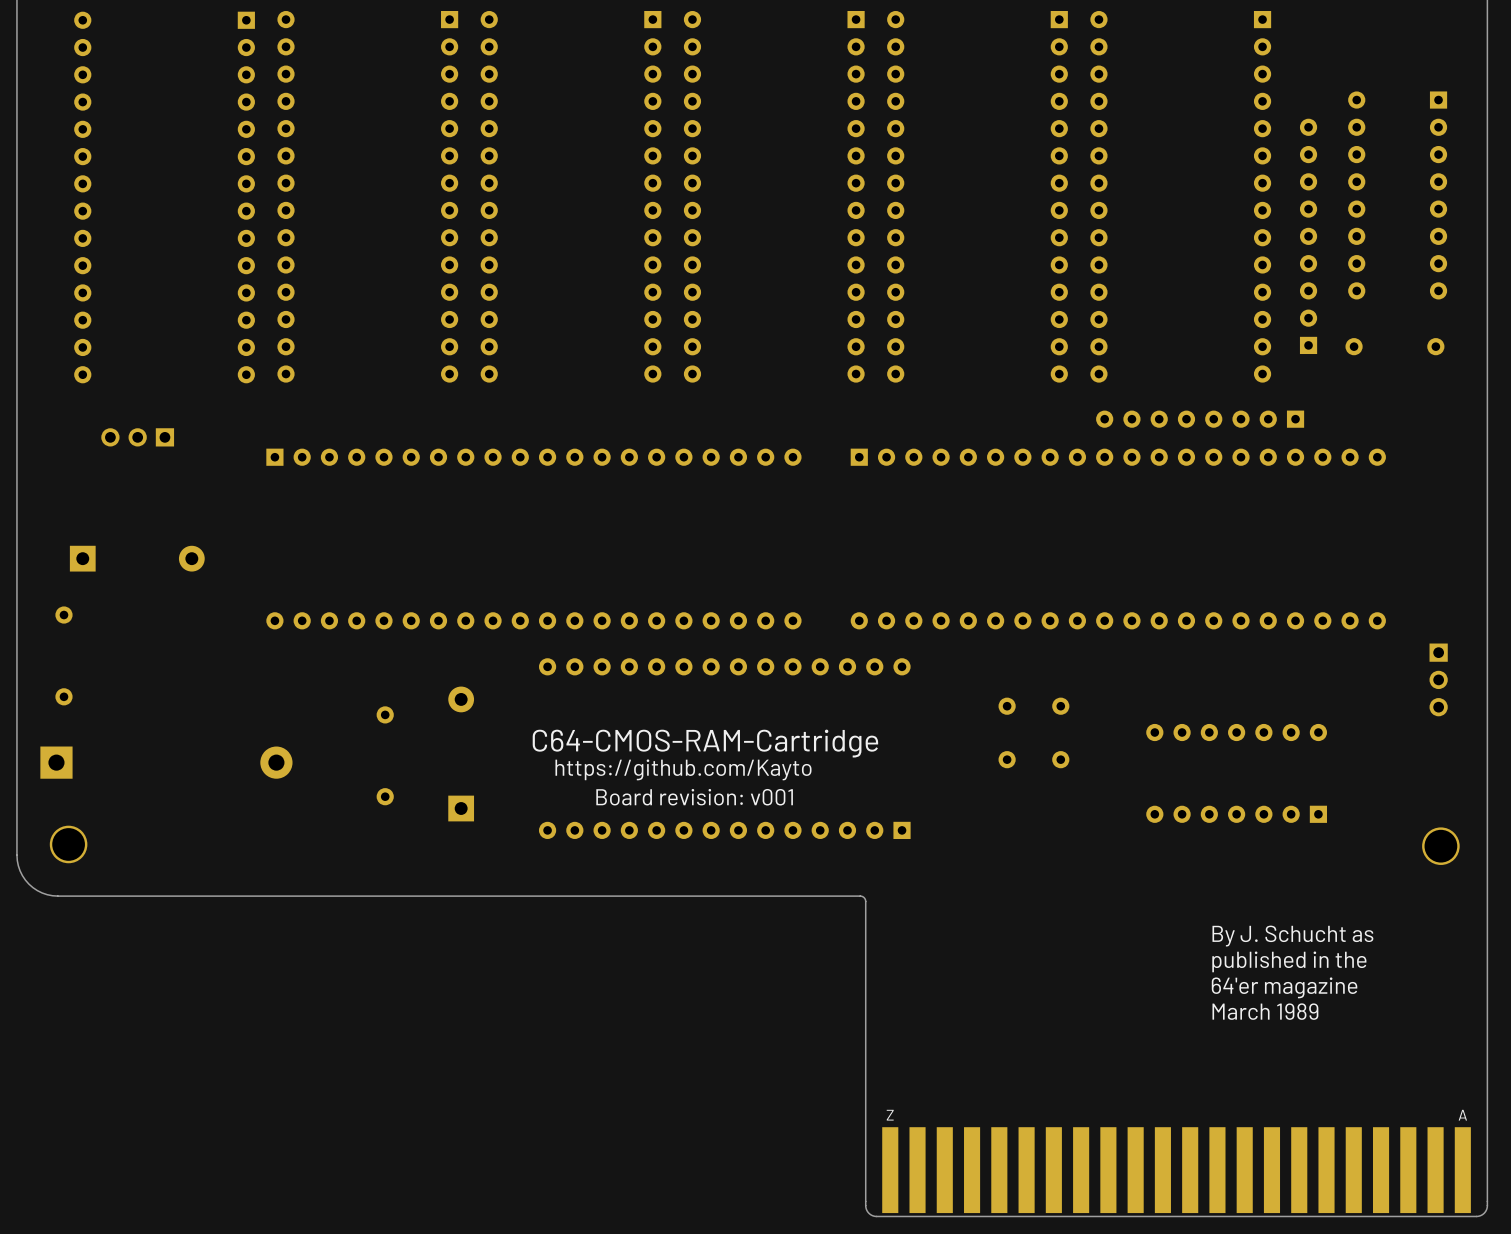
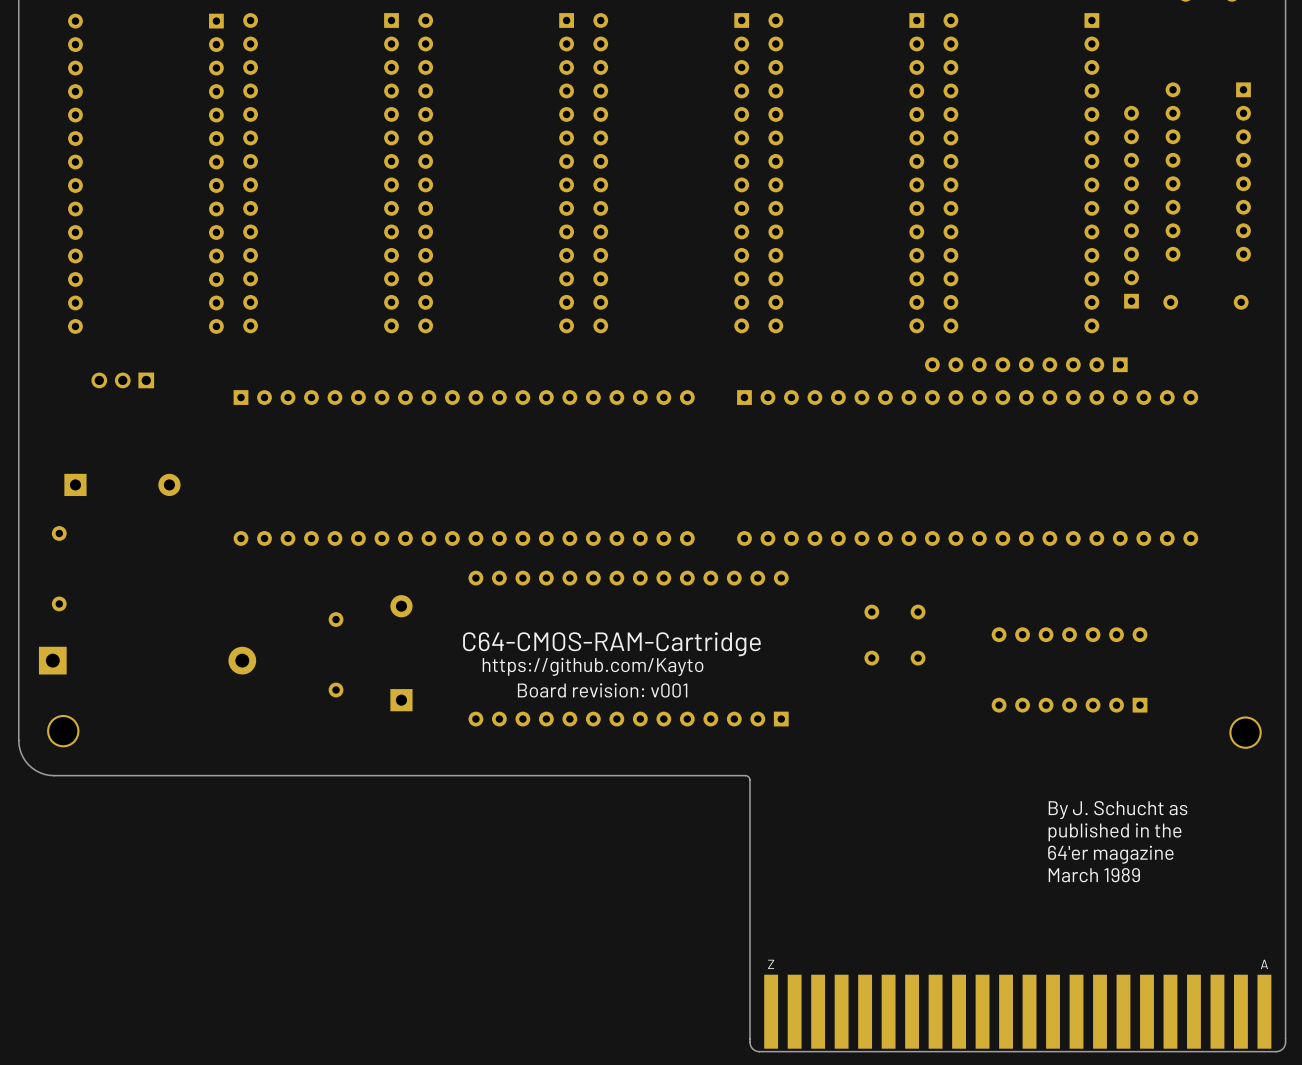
part: none -> (1026, 364)
part: (1438, 679) -> none

